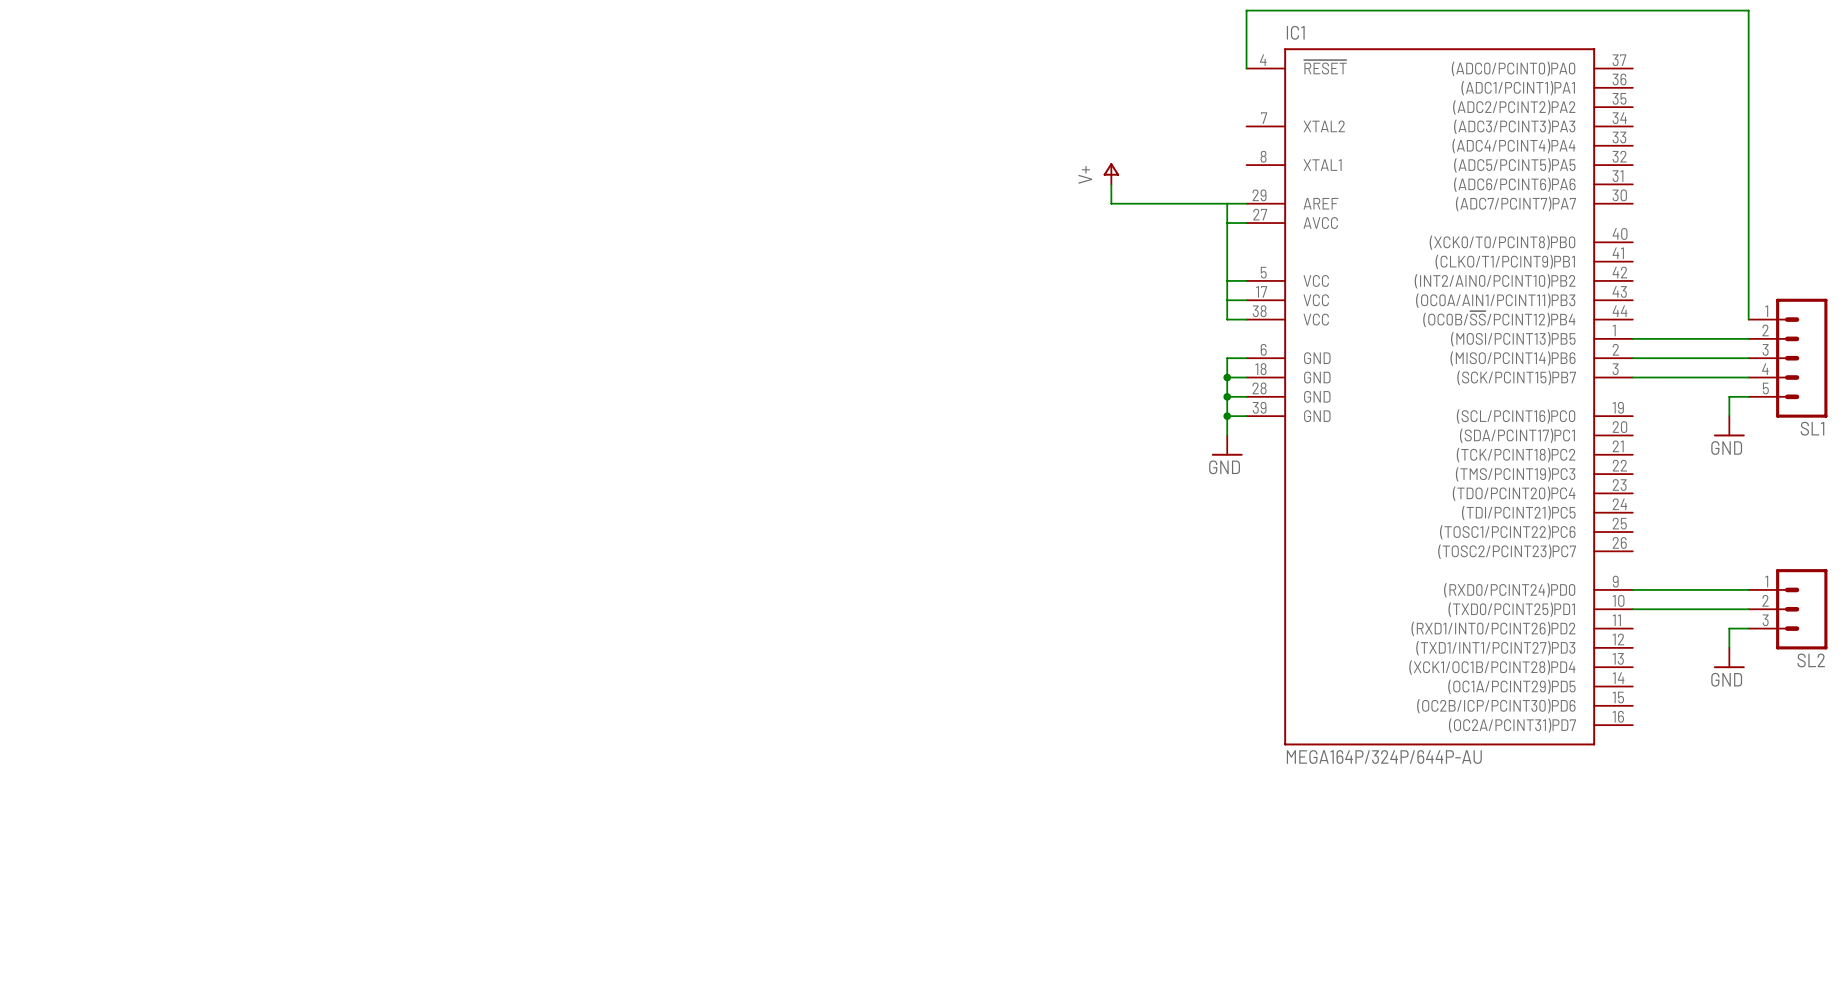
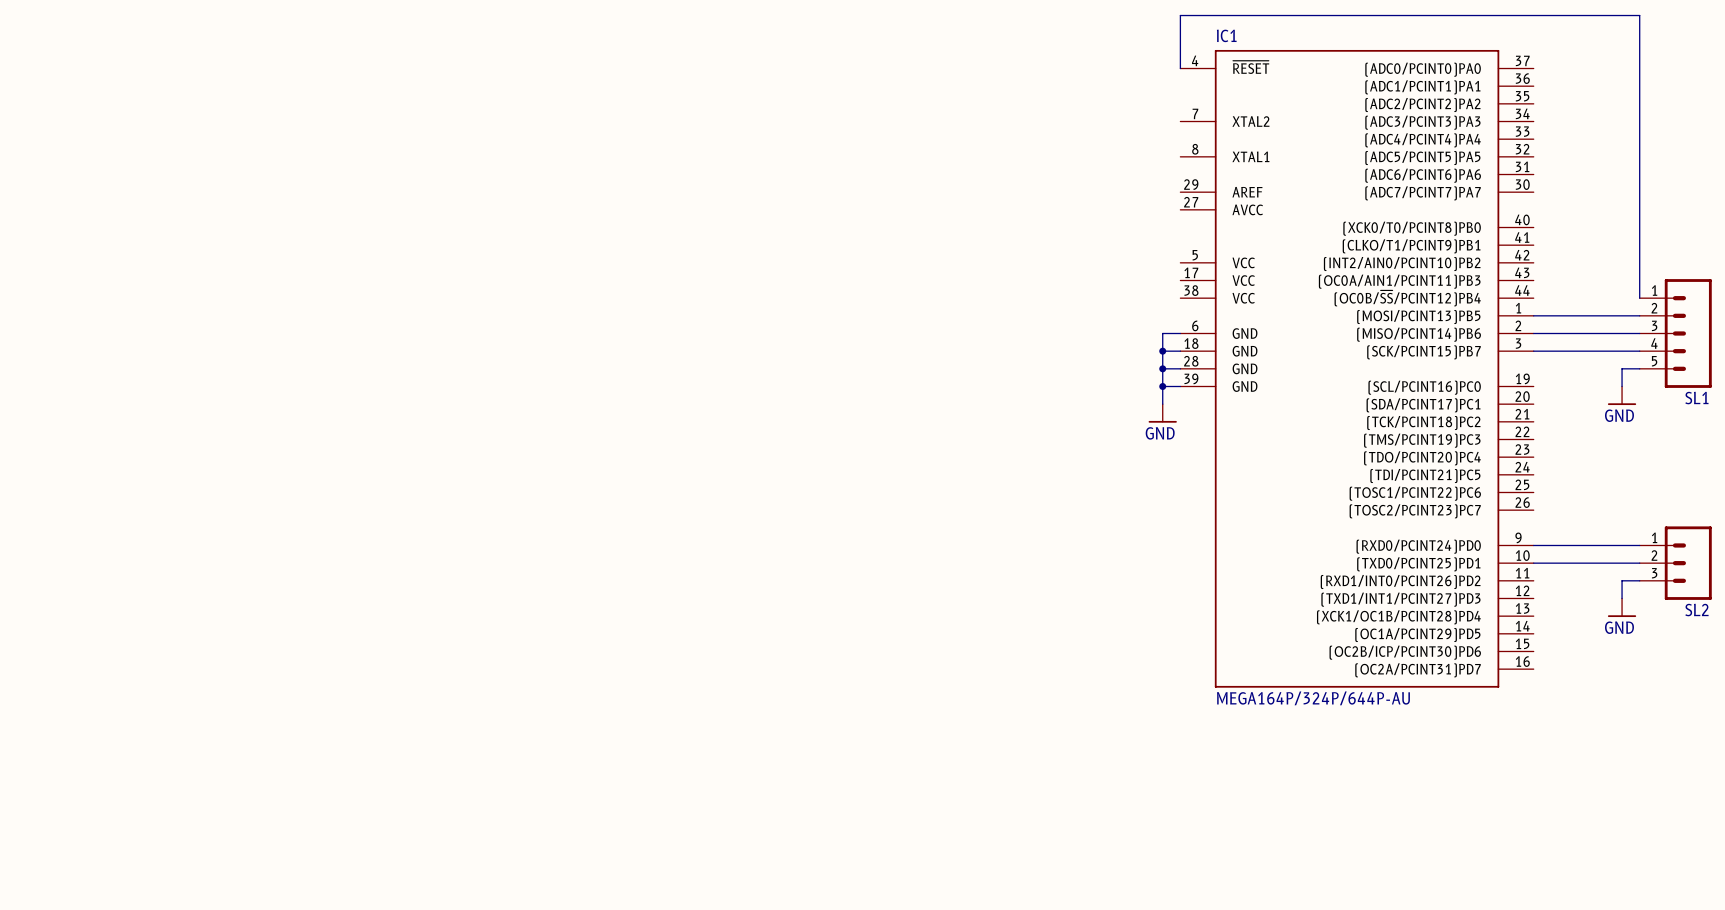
power symbol: V+ (1111, 173) -> none
wire: (1111, 184) (1111, 203) (1246, 203) -> none
wire: (1227, 203) (1227, 319) (1246, 319) -> none
wire: (1227, 223) (1246, 223) -> none
wire: (1227, 280) (1246, 280) -> none
wire: (1227, 300) (1246, 300) -> none

